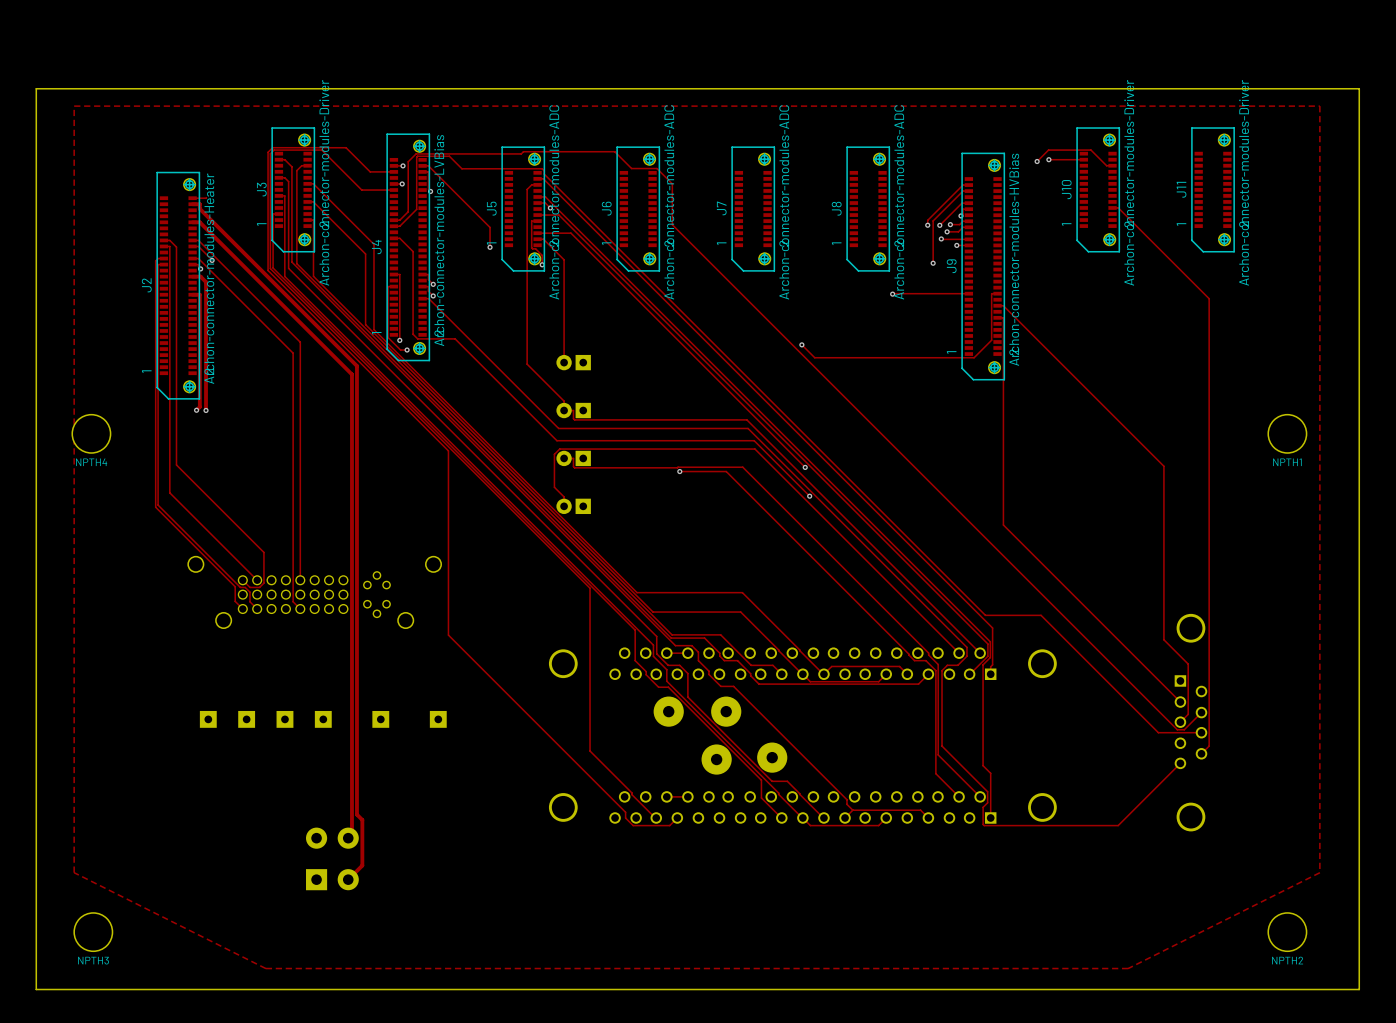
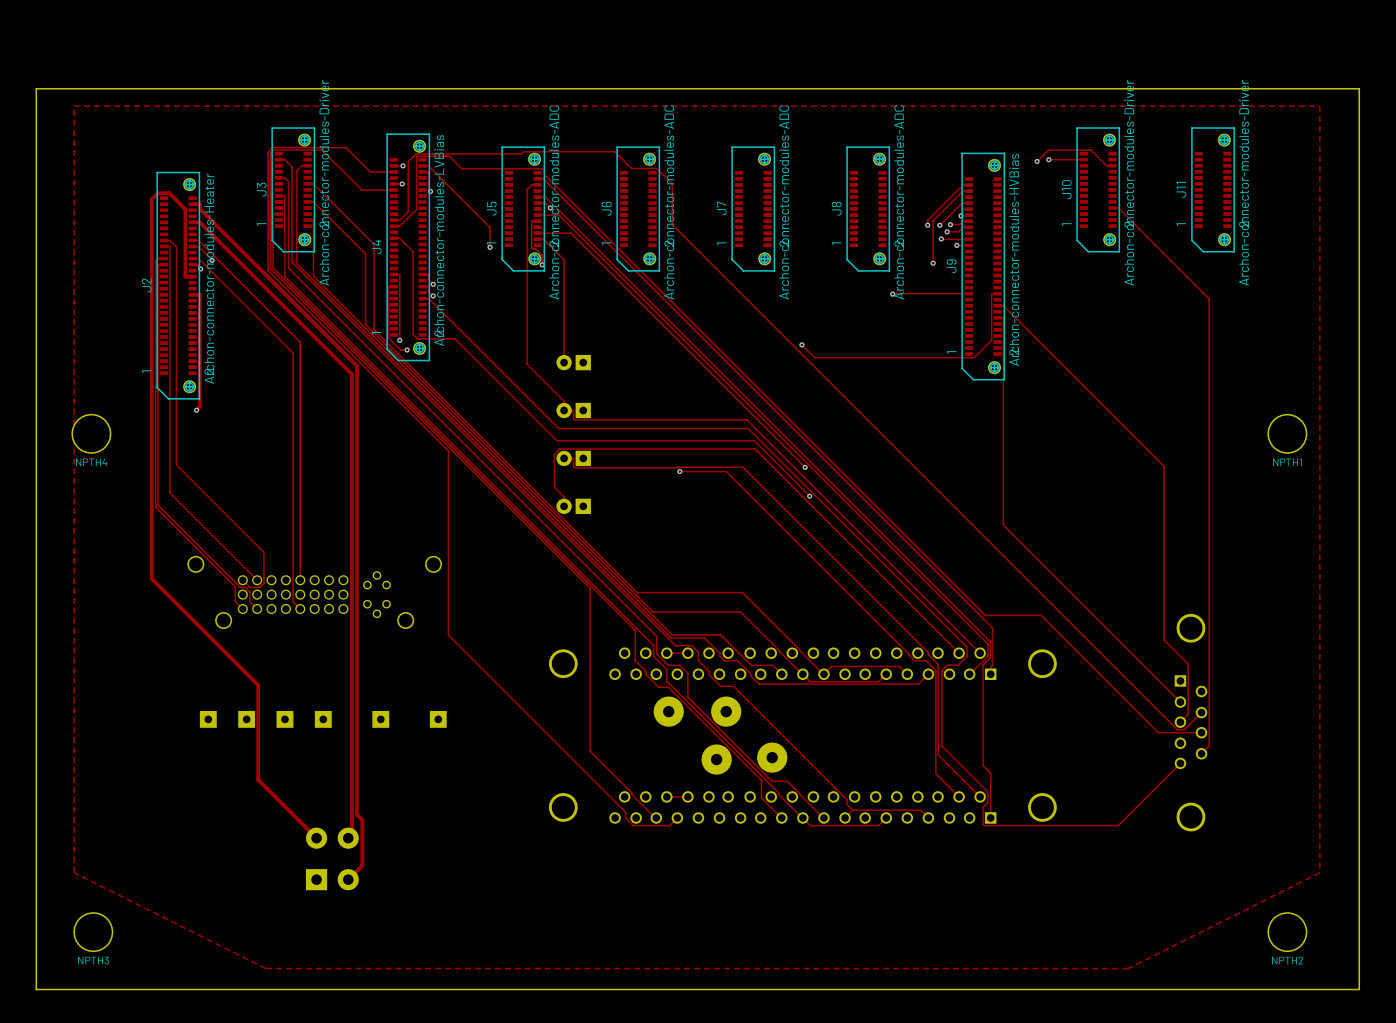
track: (192, 198) (206, 198) -> none
track: (192, 276) (200, 276) (206, 282) (206, 410) -> (192, 276) (185, 276) (185, 209) (169, 193) (158, 193) (151, 199) (151, 578) (258, 685) (258, 779) (316, 838)
via: (206, 410) -> none

